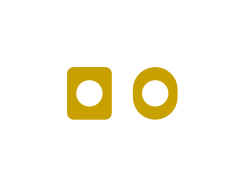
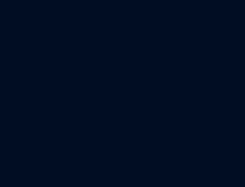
part: (122, 93) -> none

